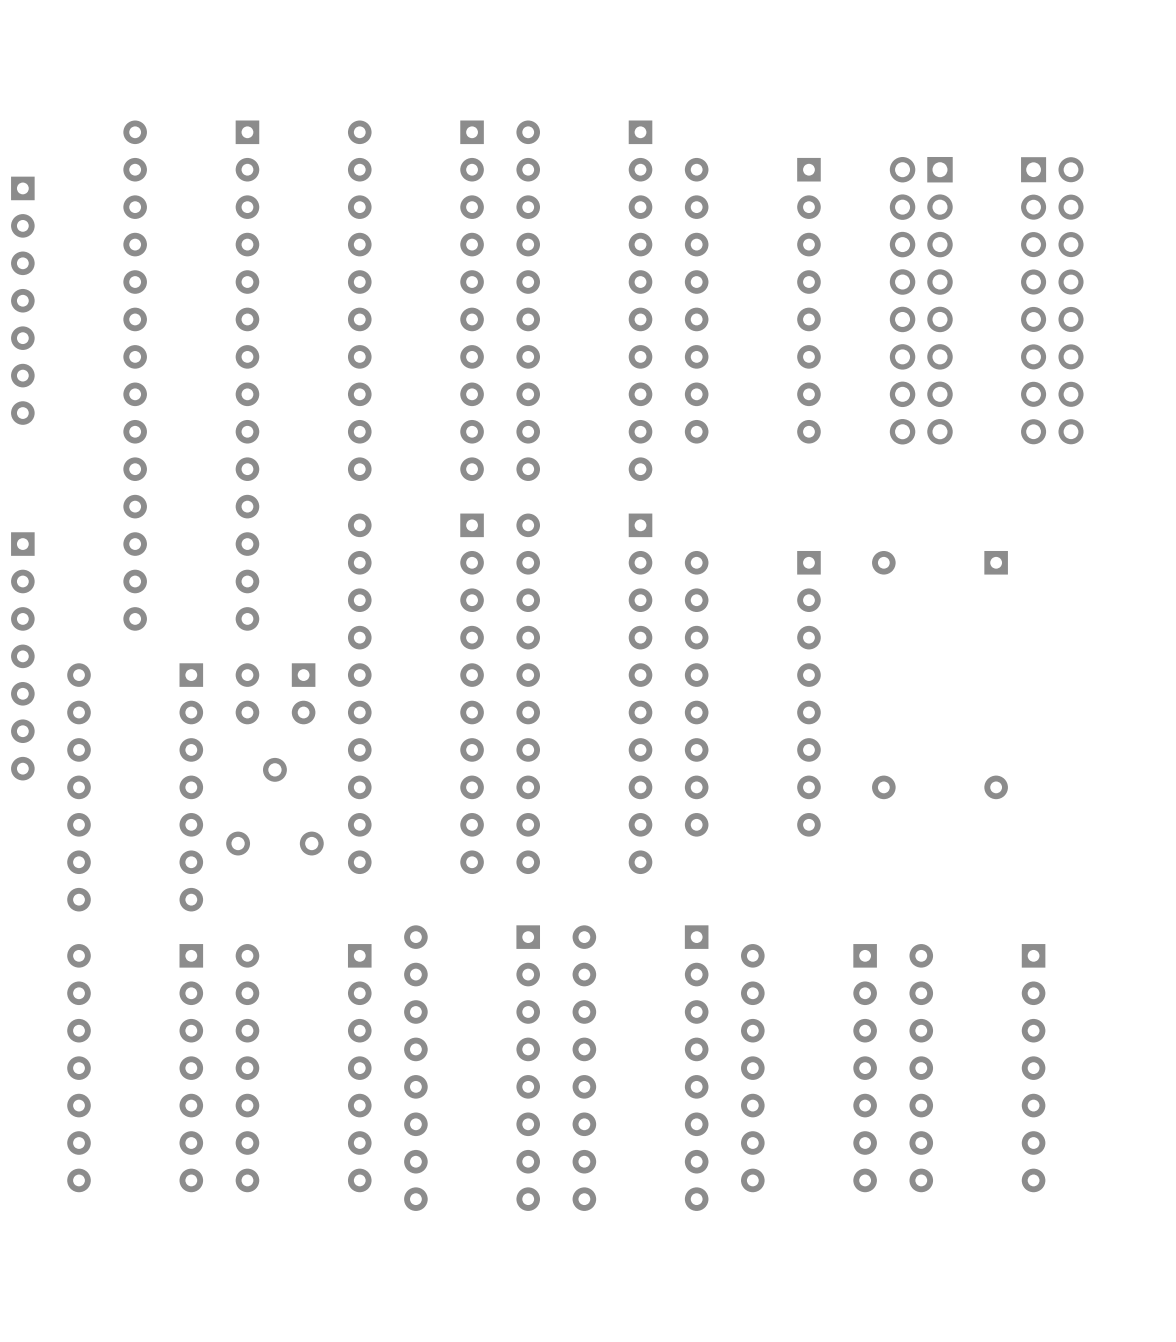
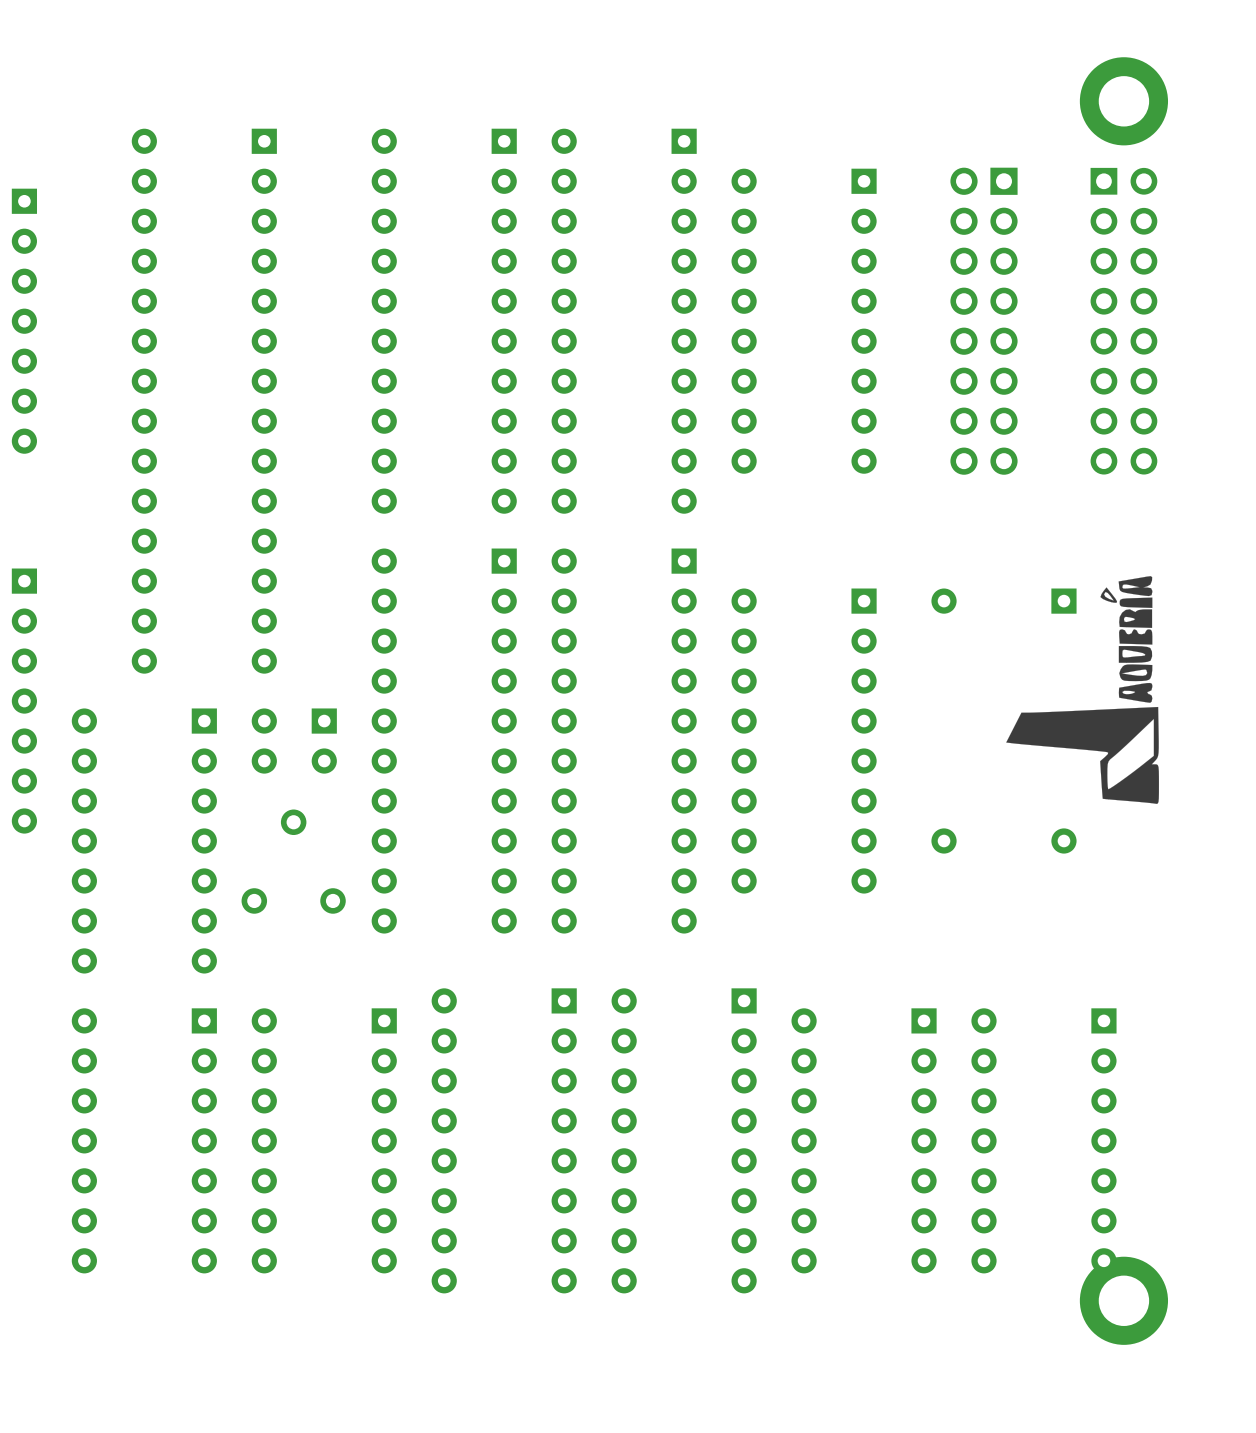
part: none -> (1123, 101)
drawing: none -> [1006, 576, 1160, 804]
part: none -> (1123, 1300)

